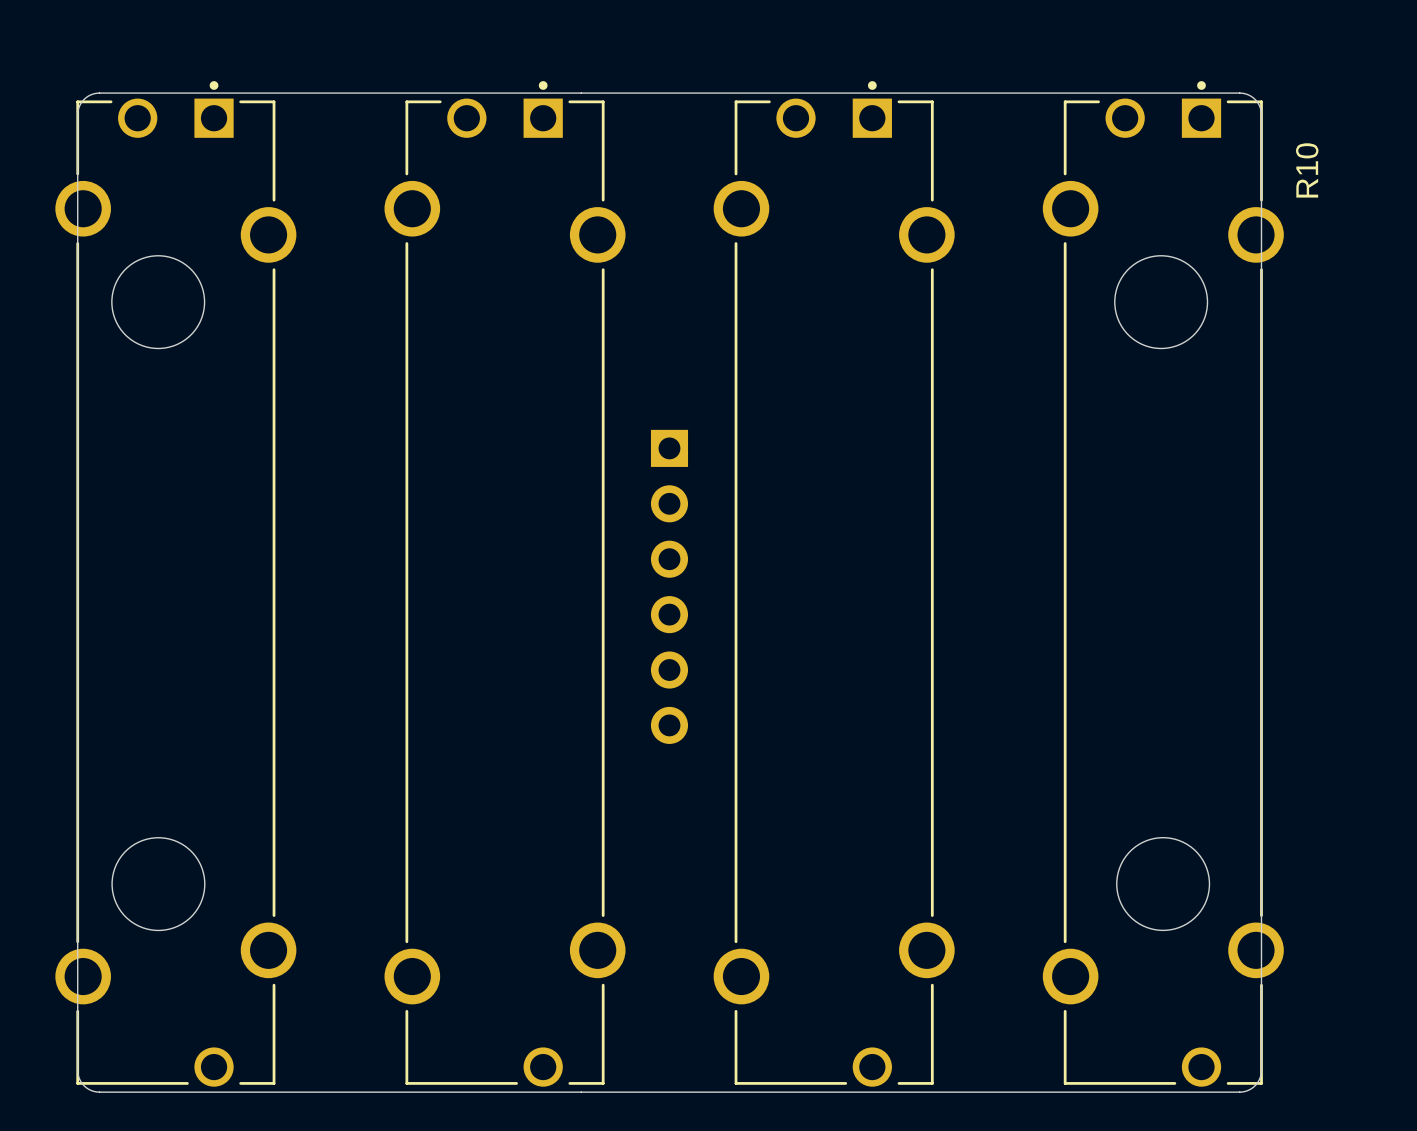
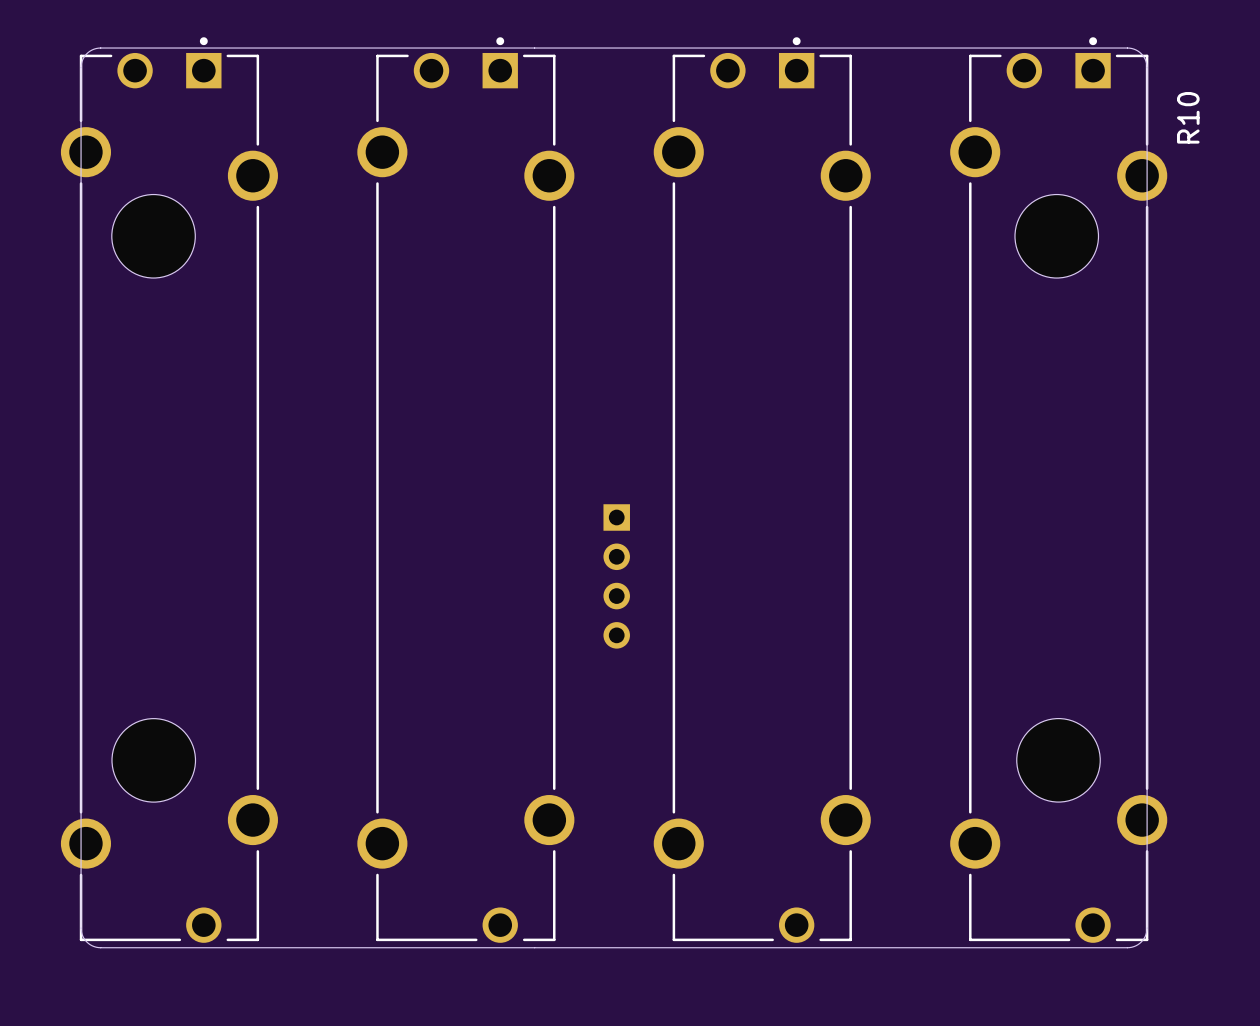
part: (669, 586) -> none
part: none -> (616, 576)

